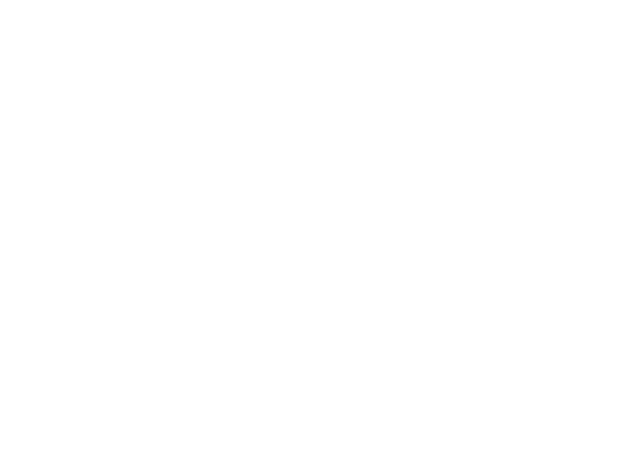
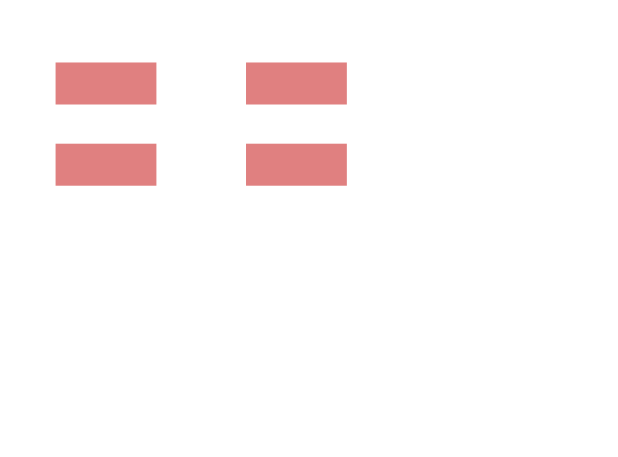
part: none -> (201, 124)

